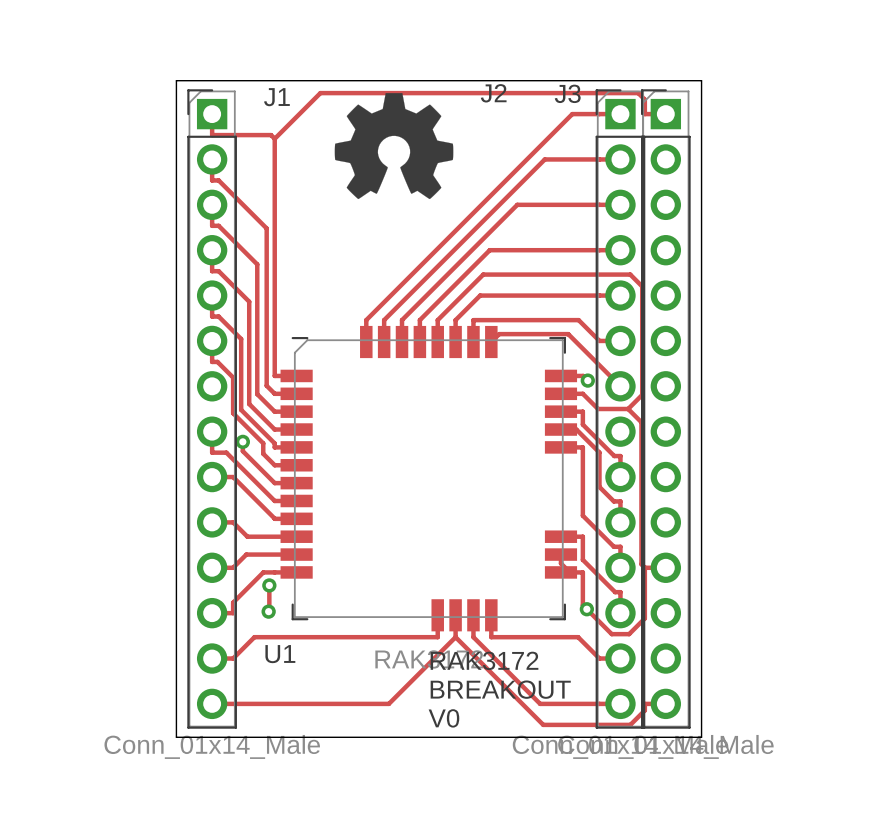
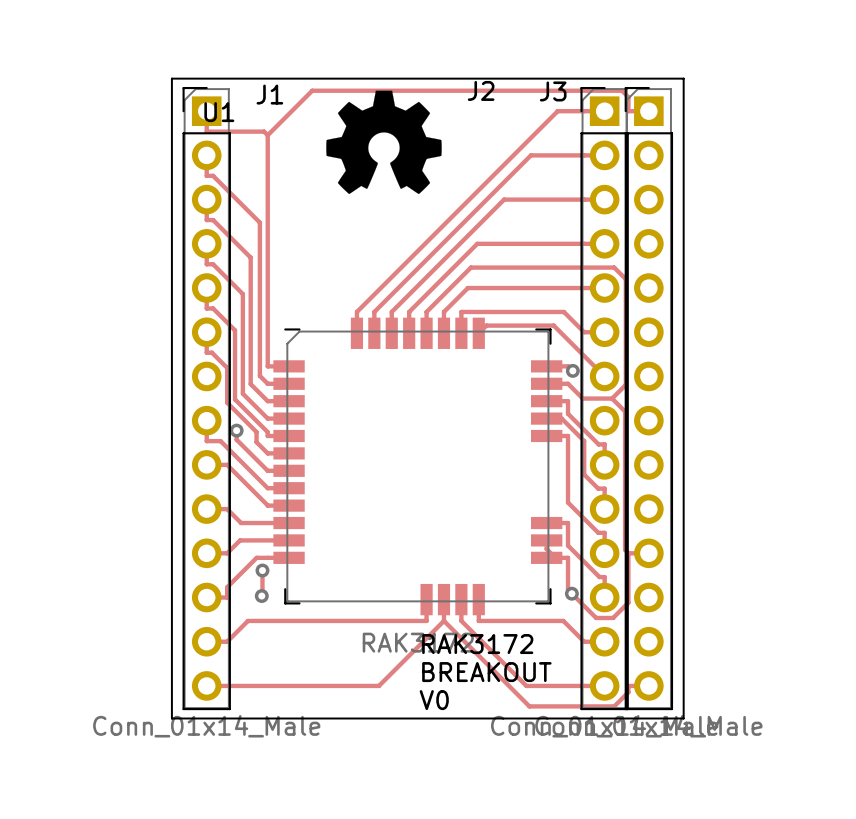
U1 name position: U1 (280, 654) -> U1 (219, 112)

